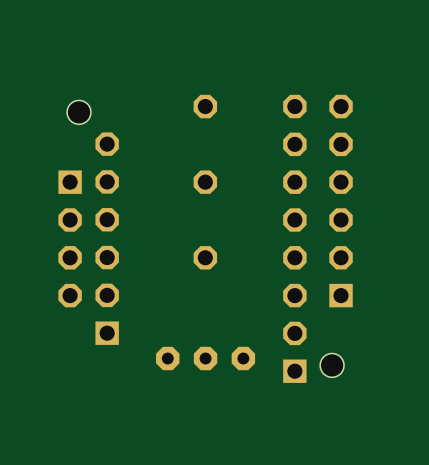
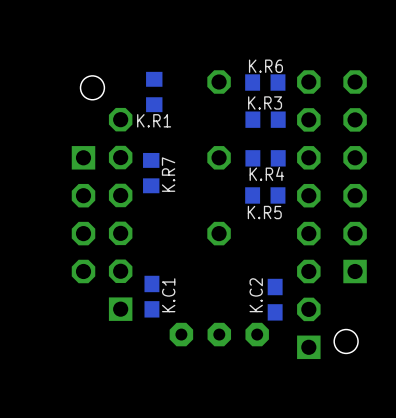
K.R6: none -> (265, 82)
K.R1: none -> (154, 92)
K.R3: none -> (265, 119)
K.R4: none -> (265, 158)
K.R7: none -> (151, 173)
K.R5: none -> (265, 195)
K.C1: none -> (151, 296)
K.C2: none -> (275, 299)

